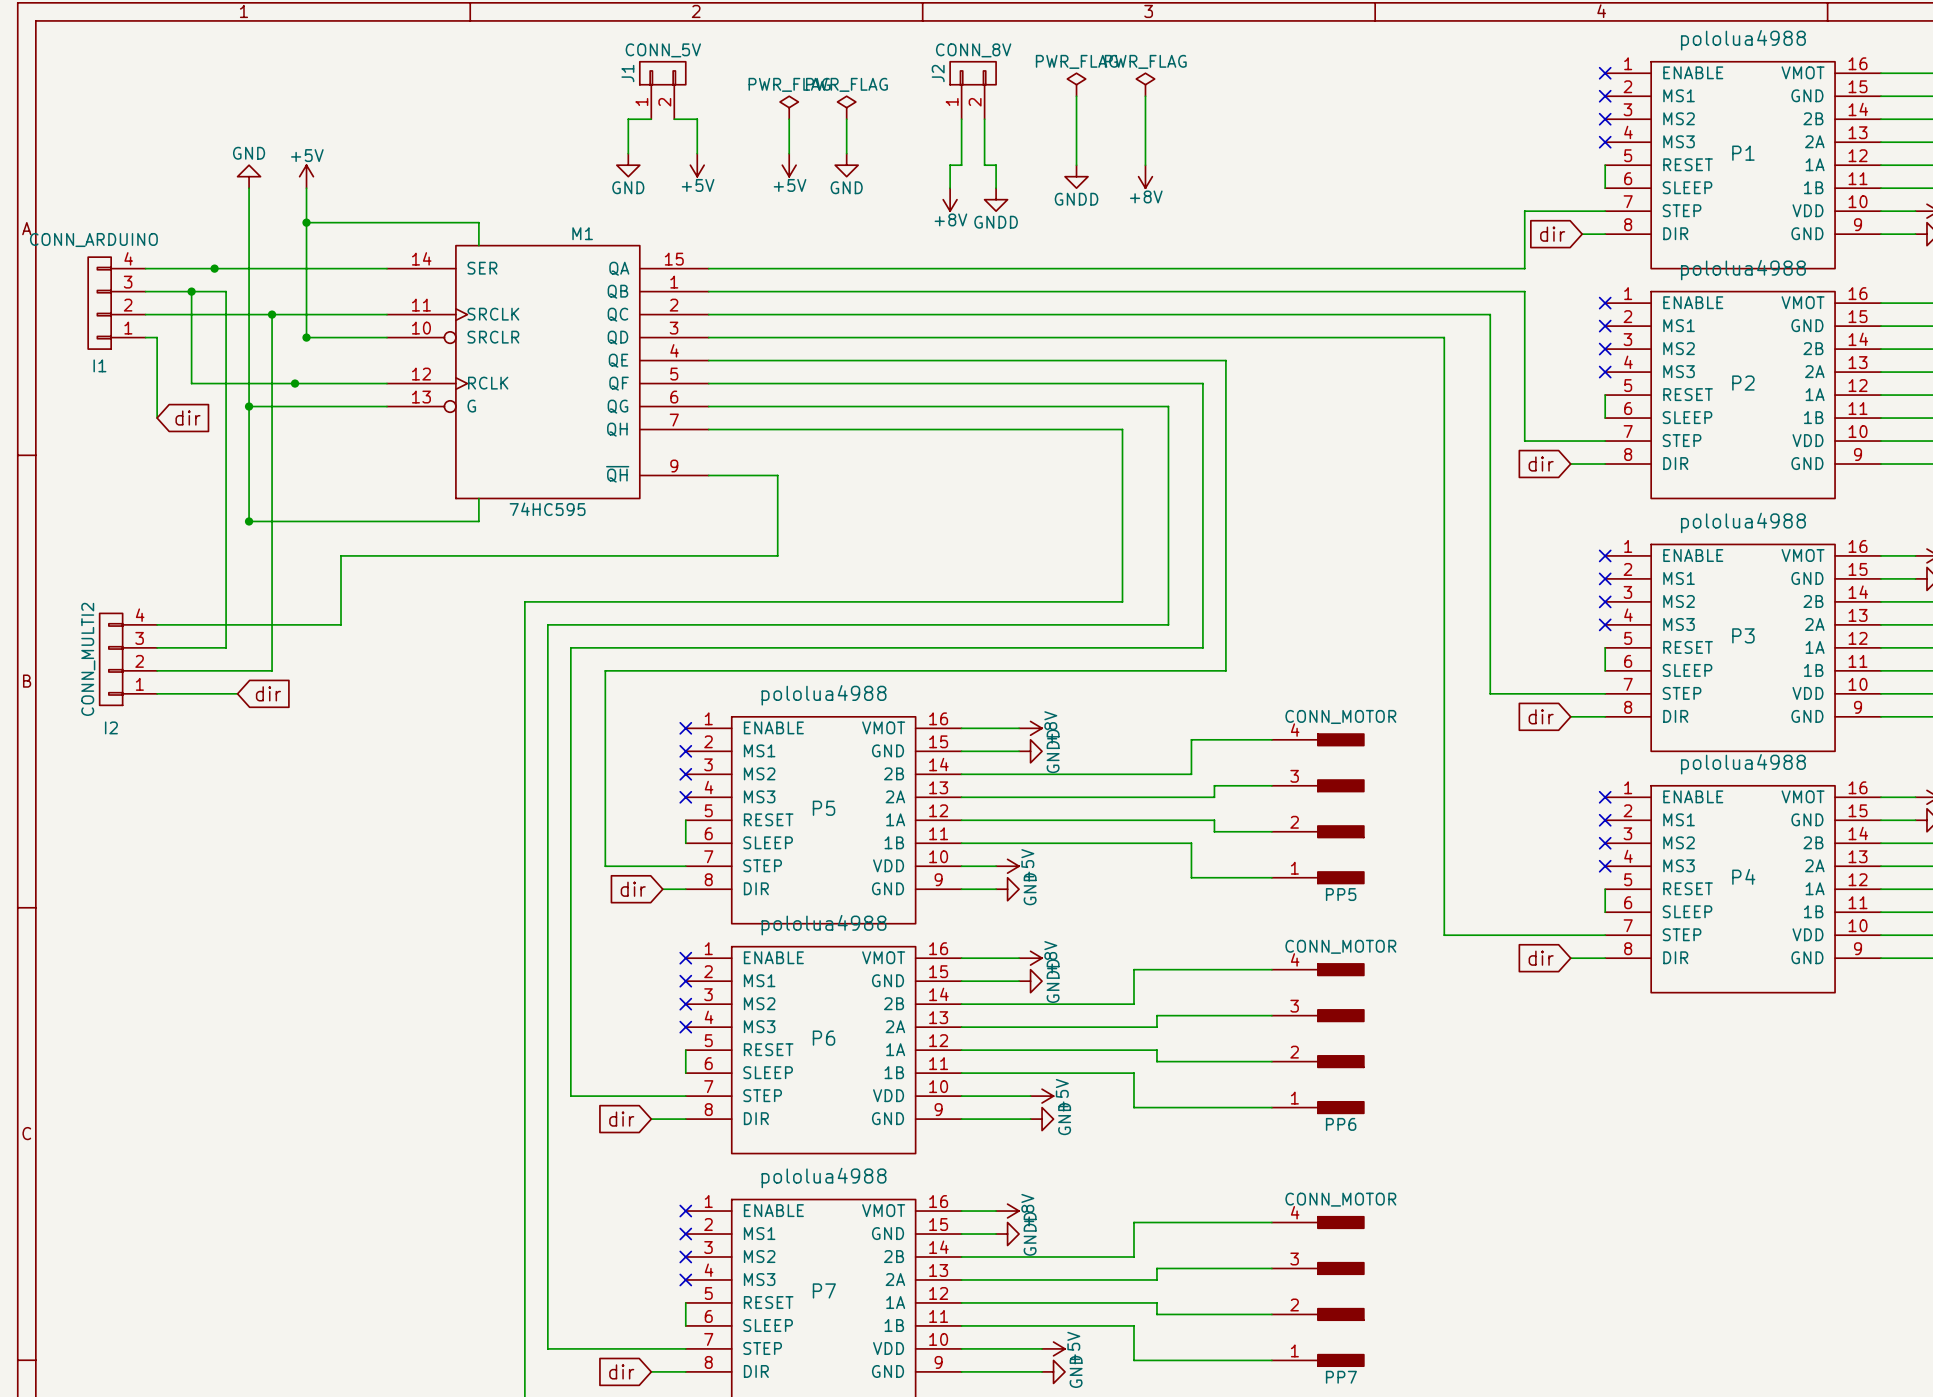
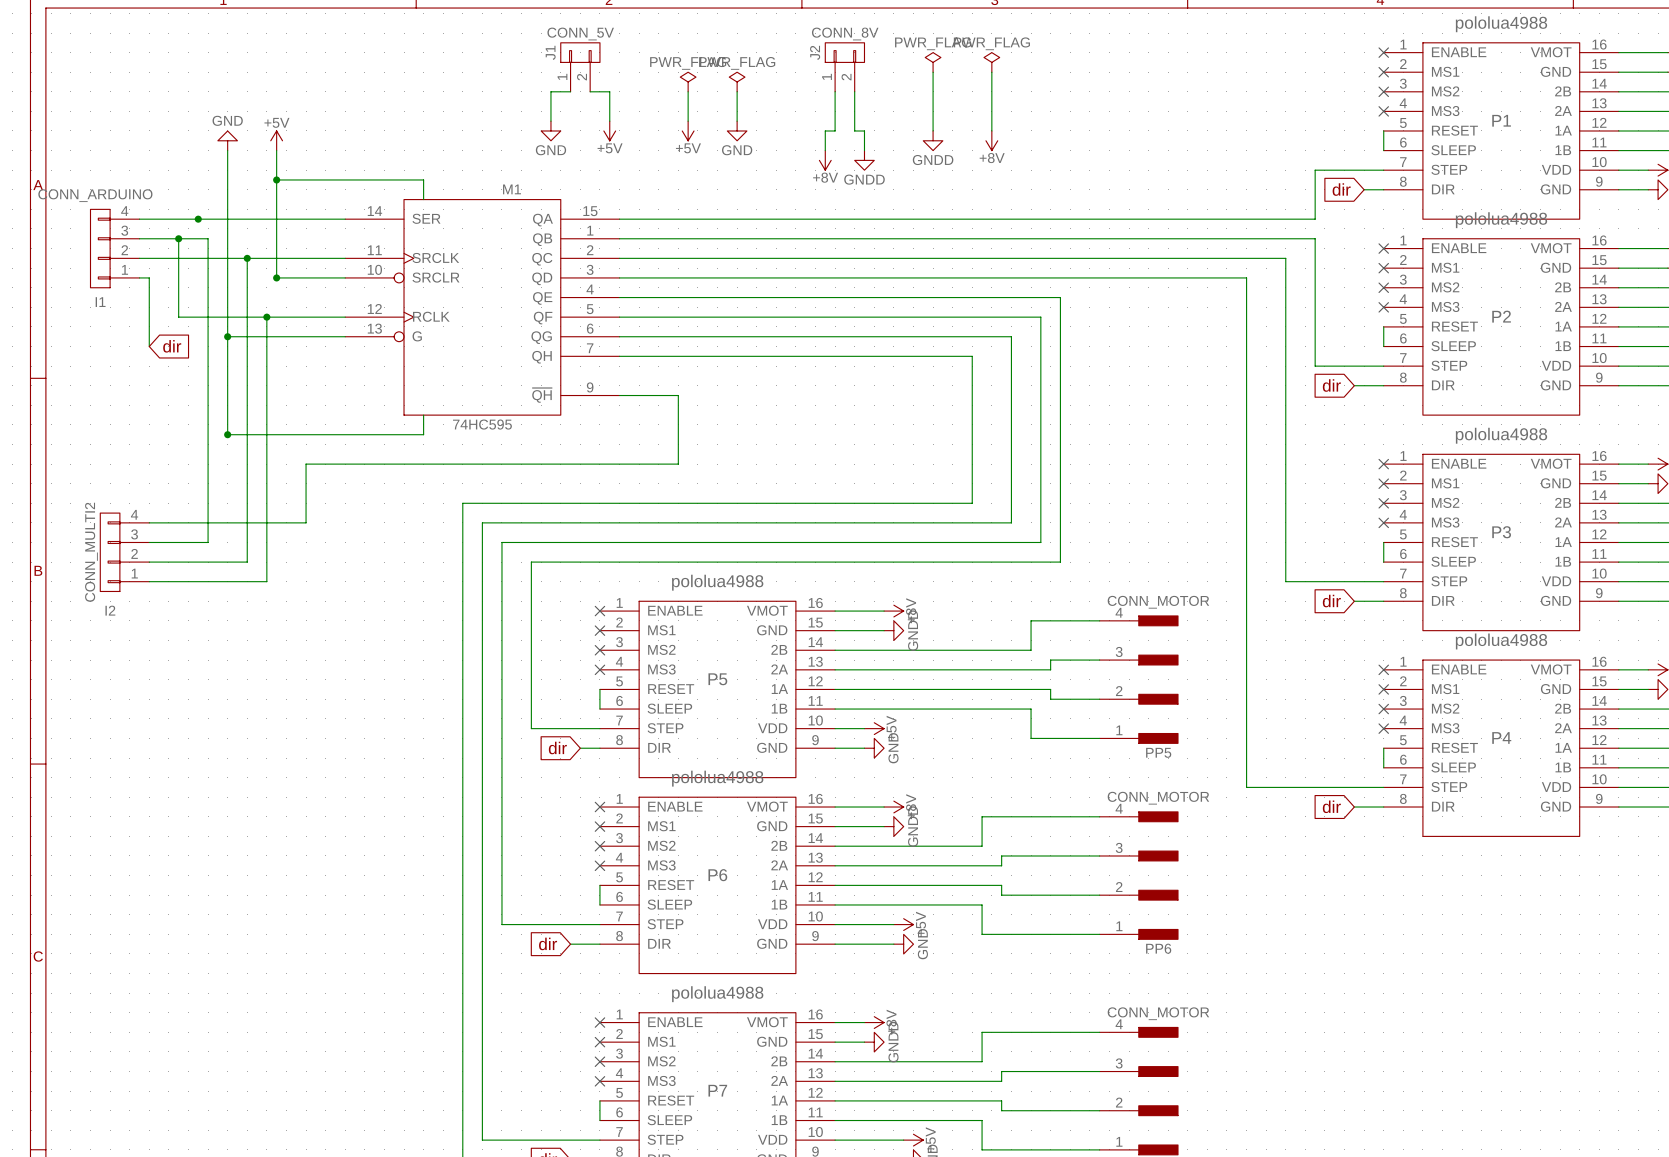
wire: none -> (266, 317) (266, 581) (217, 581)
global label: dir (268, 693) -> none

